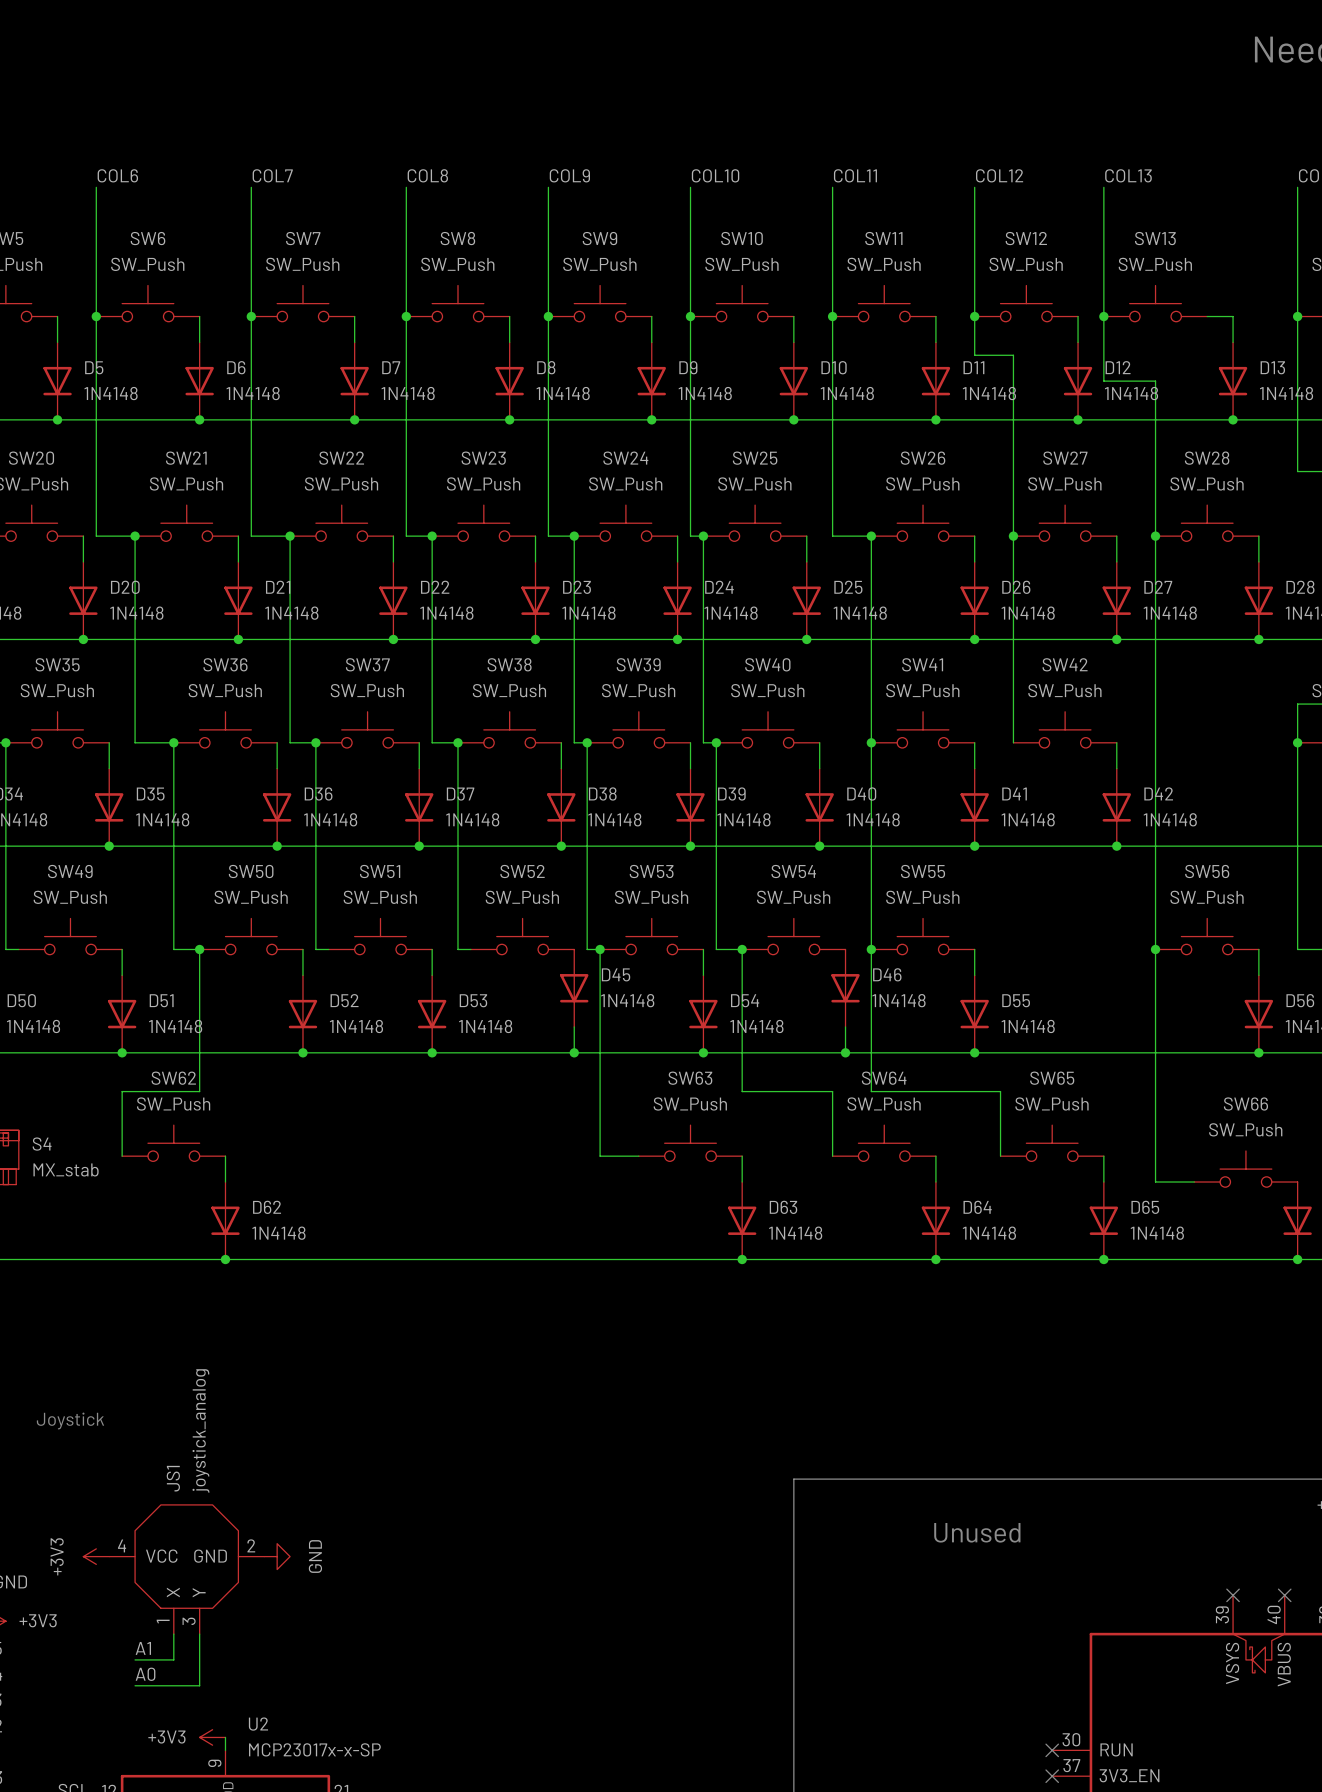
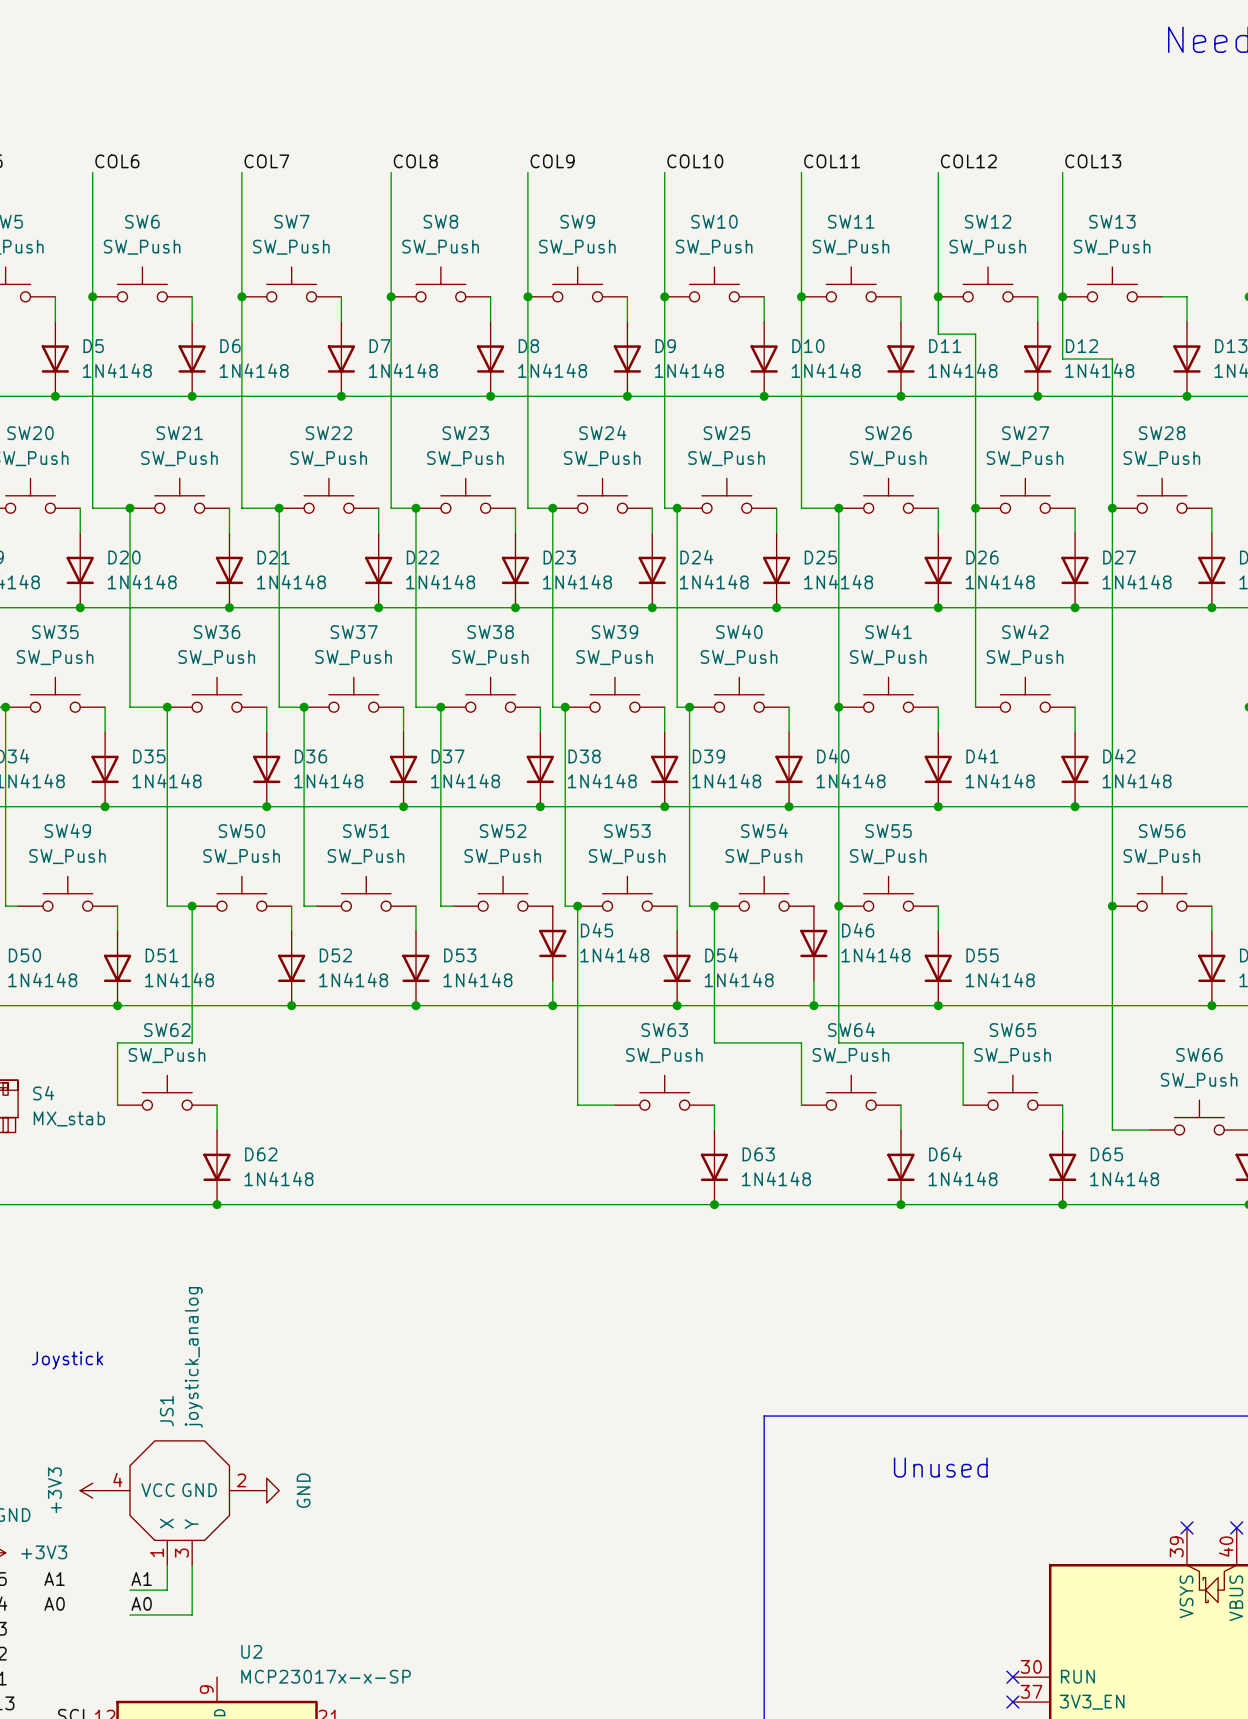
label: none -> A1 (54, 1579)
label: none -> A0 (54, 1603)
power symbol: +3V3 (212, 1737) -> none
wire: (225, 1737) (225, 1750) -> none

